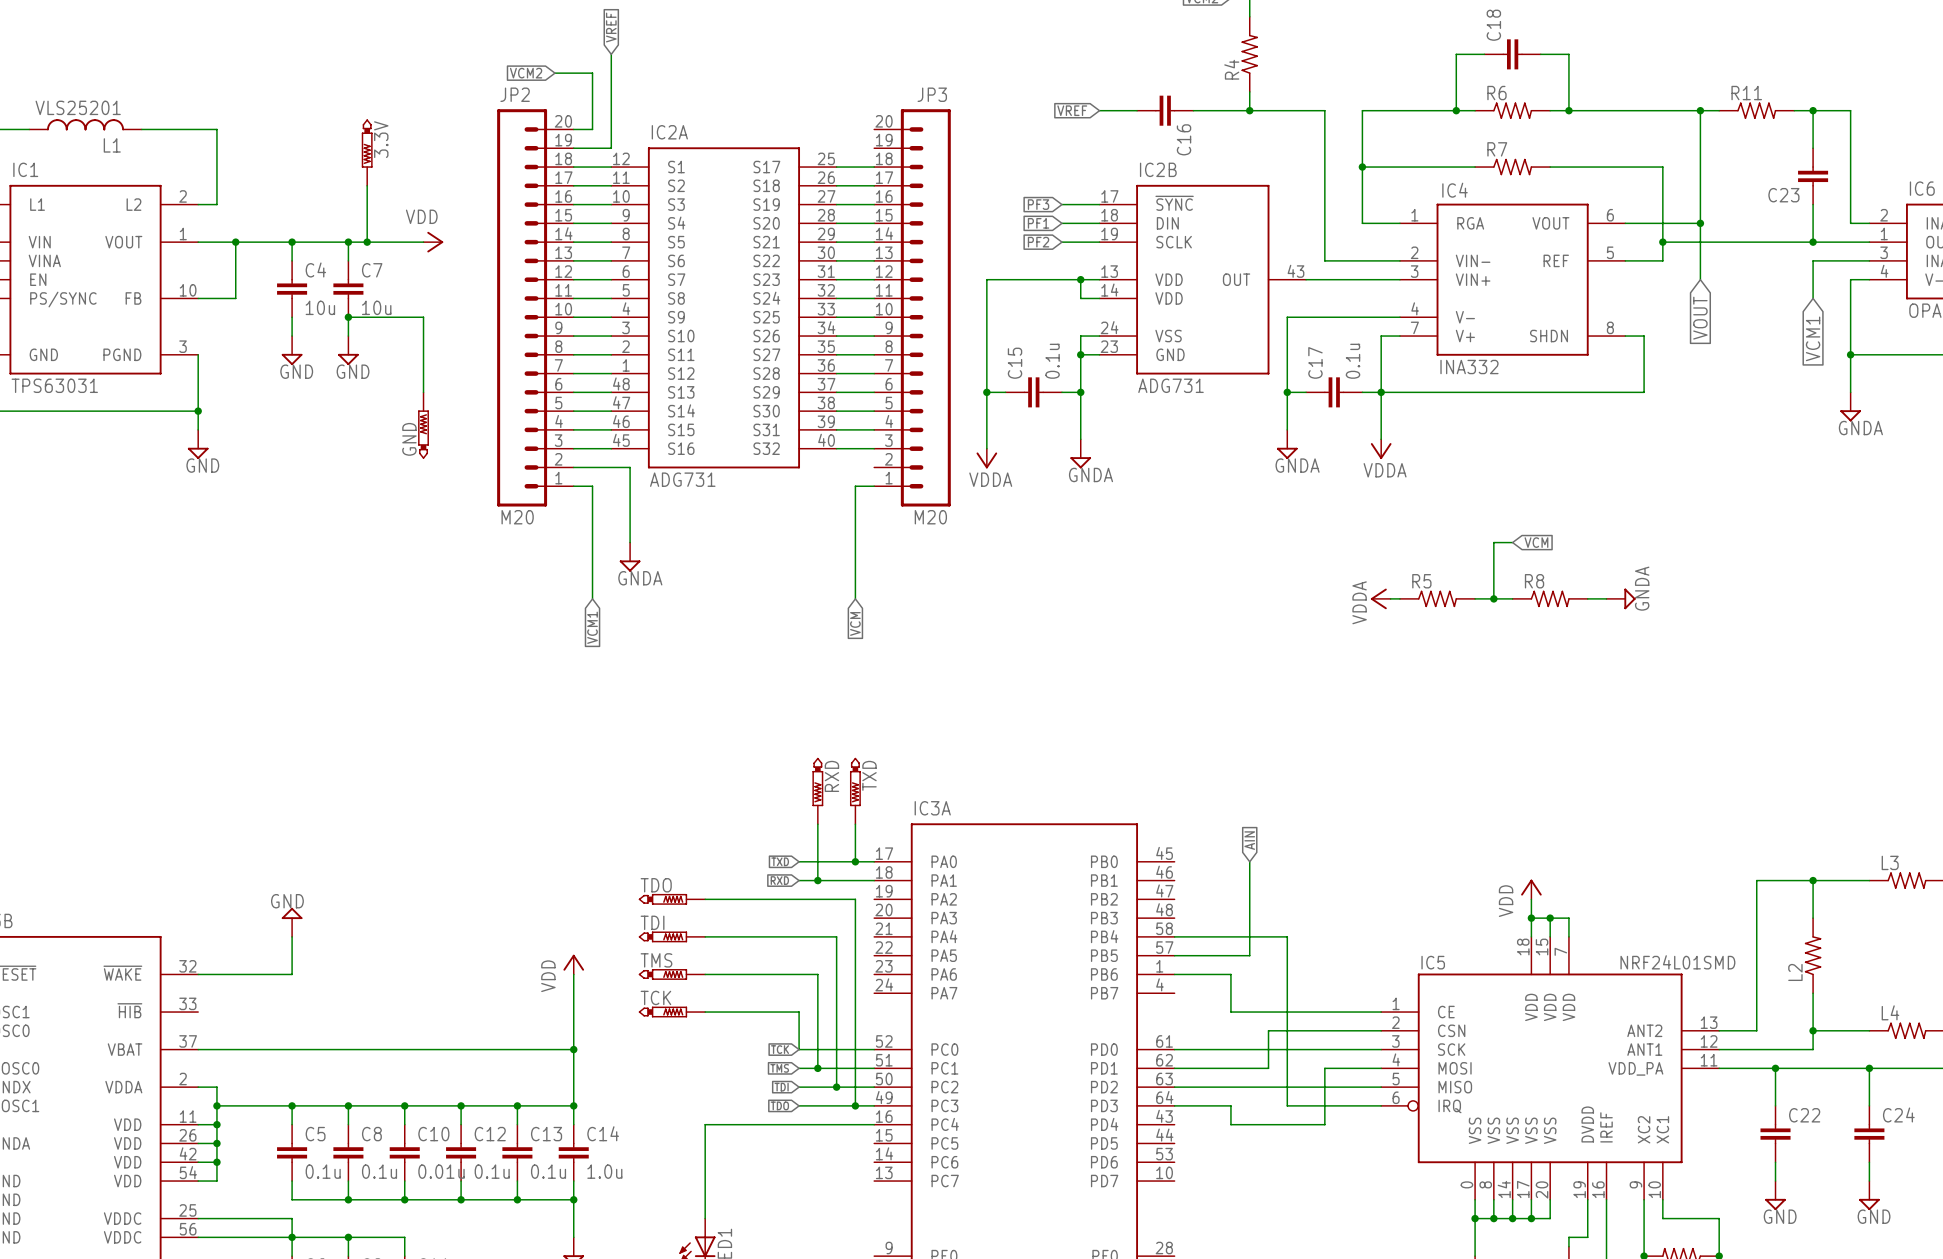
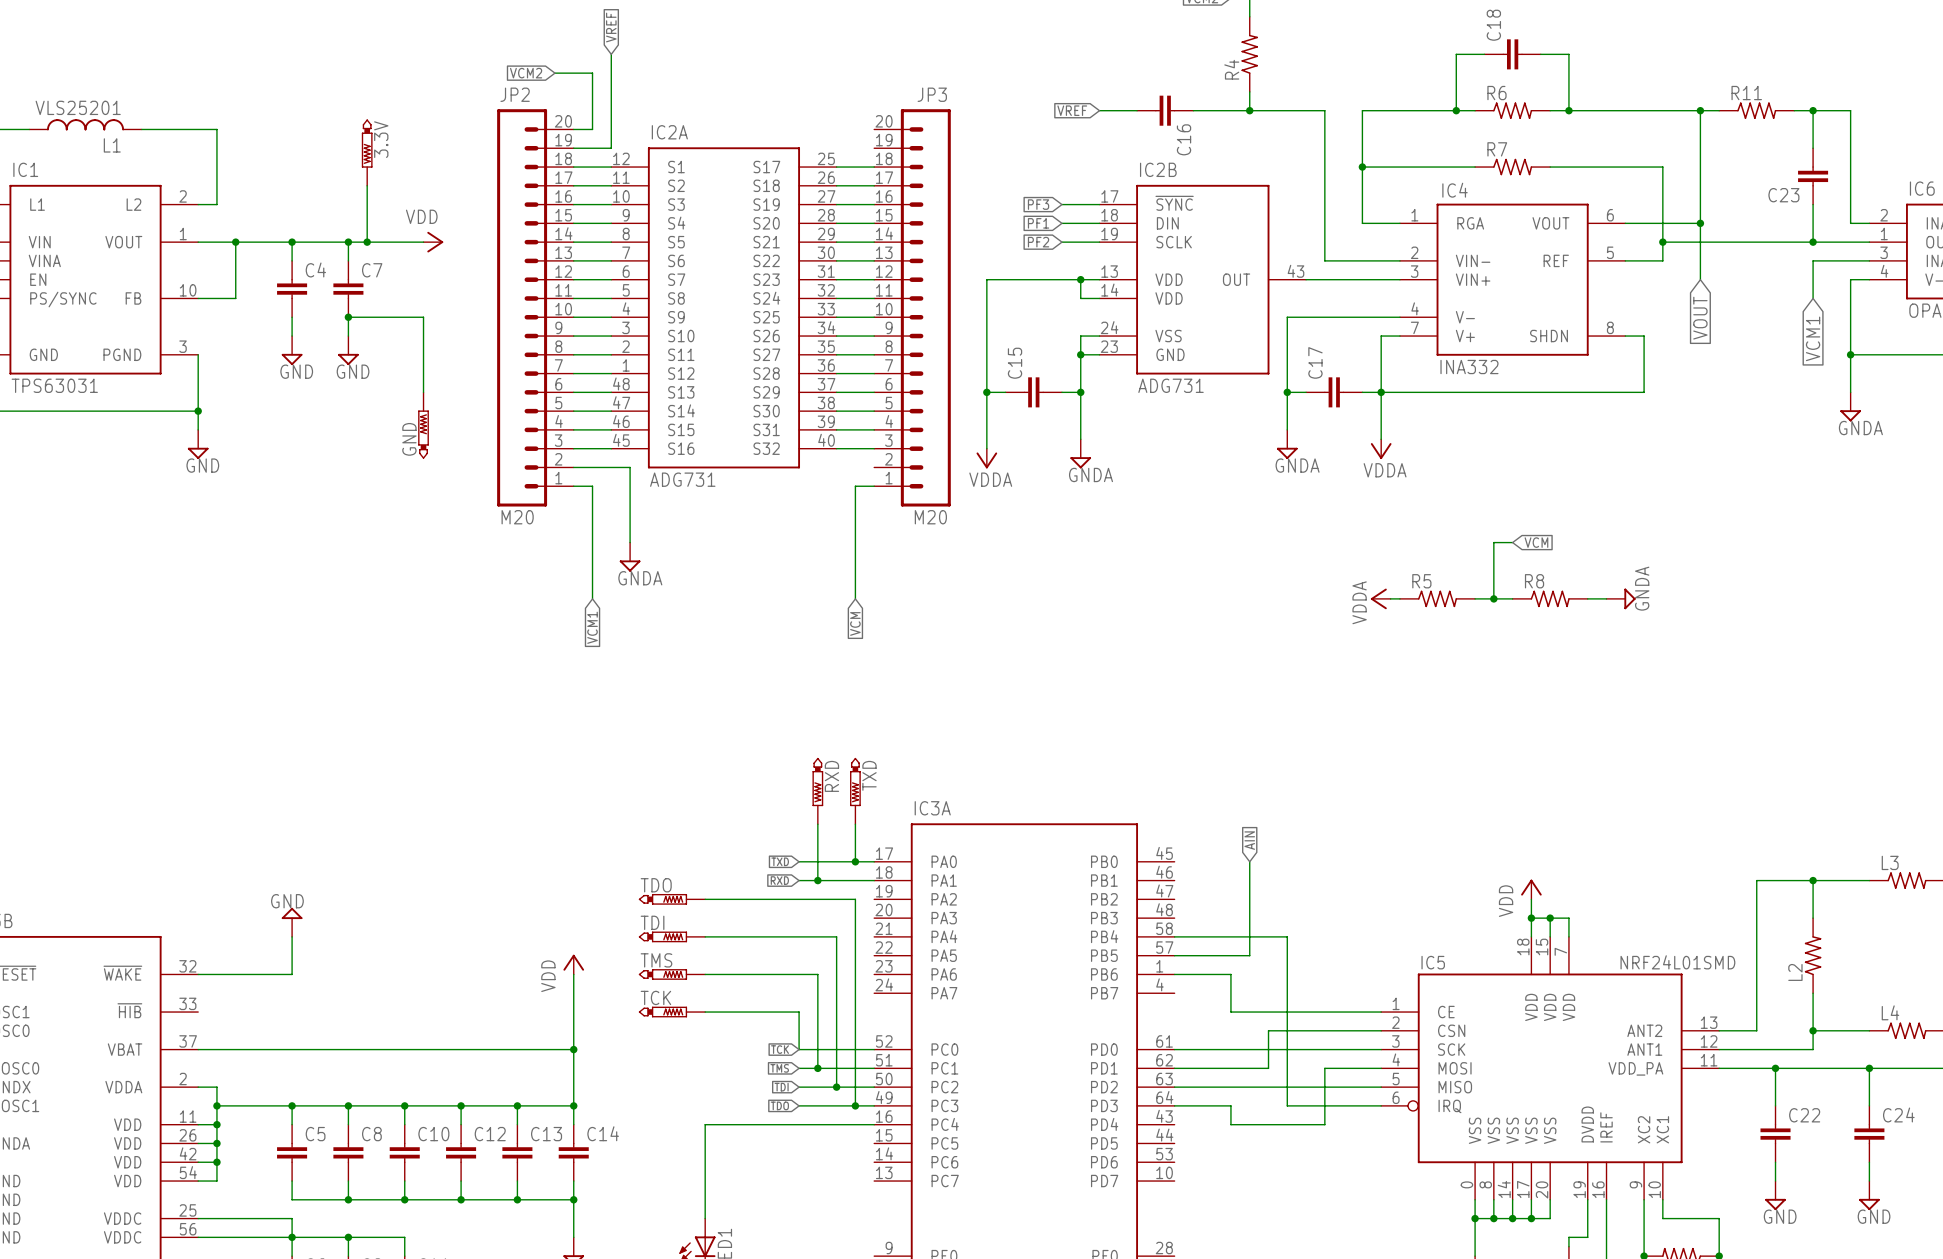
C4 value: 10u (320, 307) -> none
C7 value: 10u (376, 307) -> none
C15 value: 0.1u (1052, 361) -> none
C17 value: 0.1u (1353, 361) -> none
C5 value: 0.1u (323, 1171) -> none
C8 value: 0.1u (379, 1171) -> none
C10 value: 0.01u (441, 1171) -> none
C12 value: 0.1u (492, 1171) -> none
C13 value: 0.1u (548, 1171) -> none
C14 value: 1.0u (604, 1171) -> none

